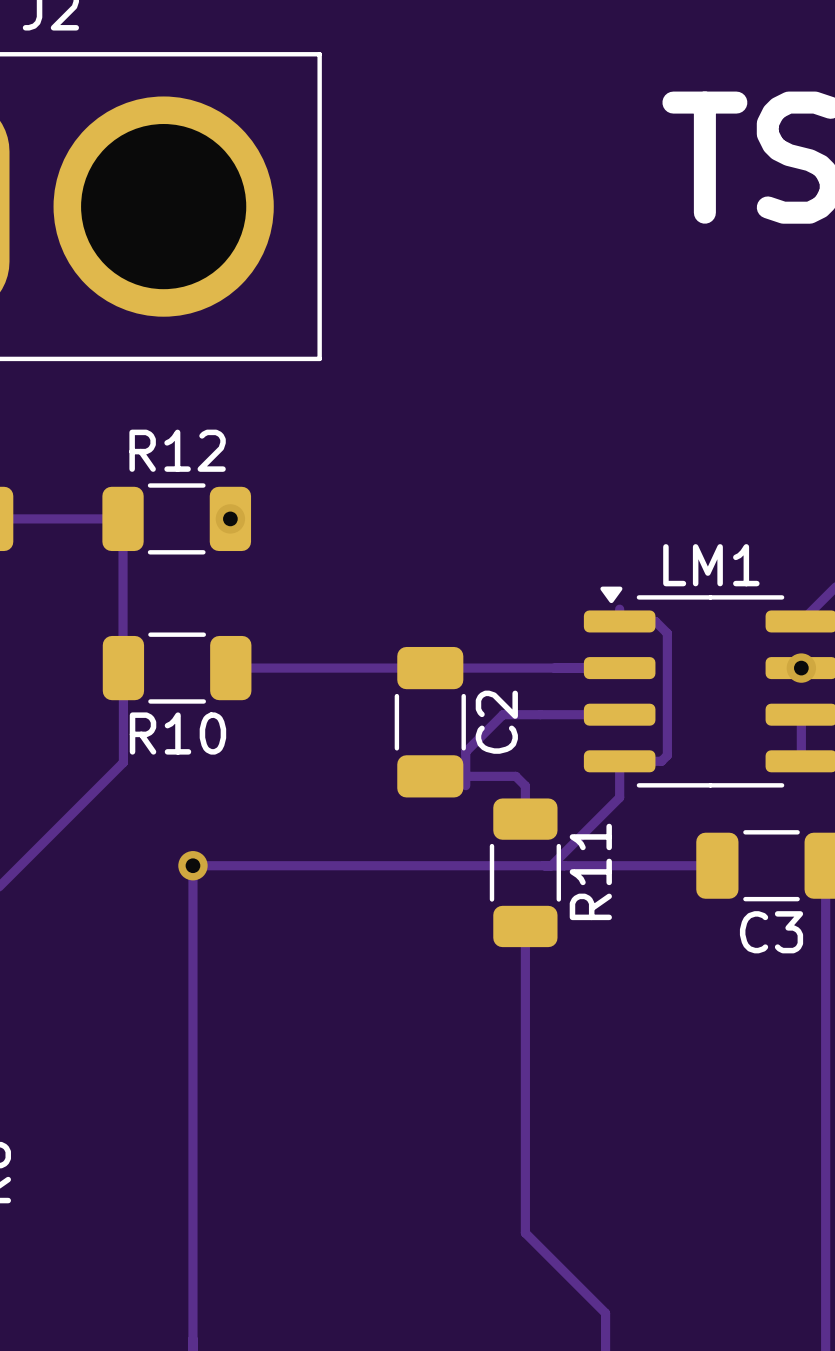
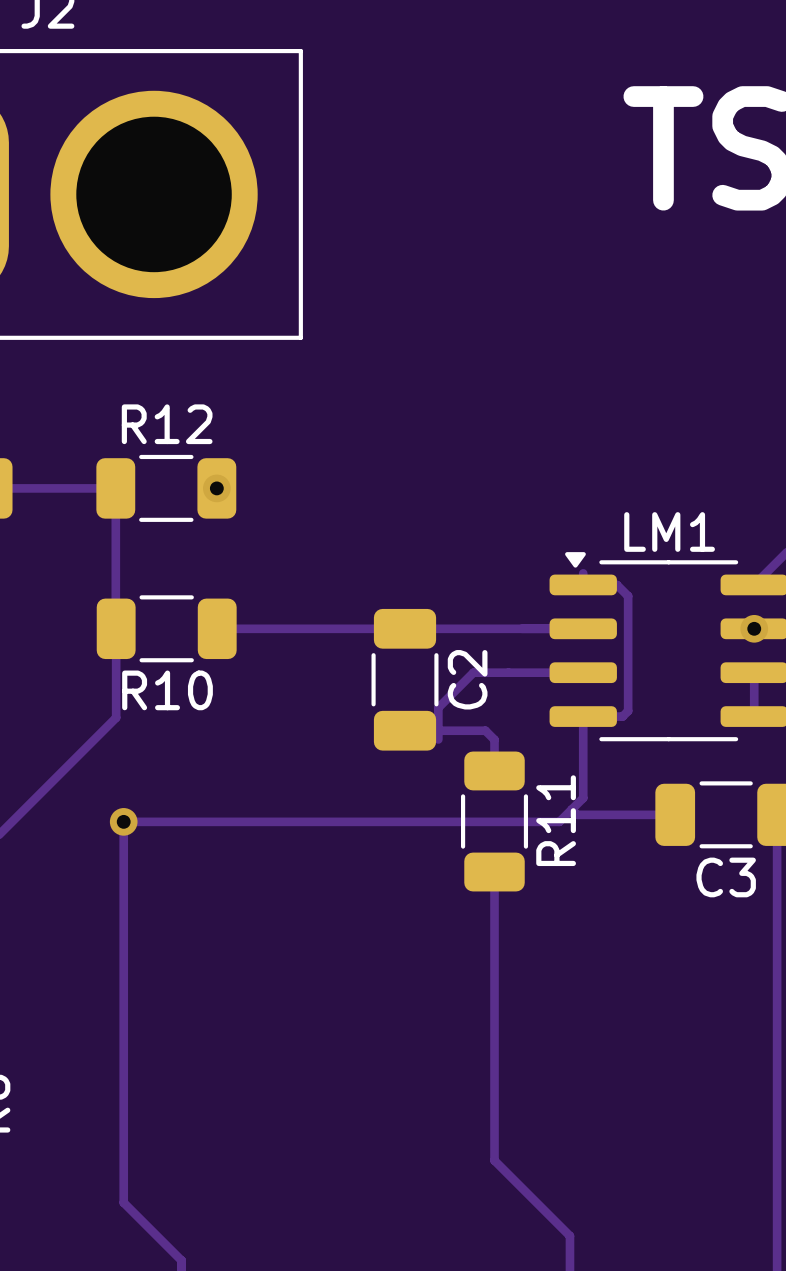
track: (619, 797) (551, 865) -> none
via position: (192, 865) -> (123, 821)
track: (613, 865) (192, 865) (192, 1339) -> (583, 750) (583, 798) (559, 821) (123, 821) (123, 1202) (181, 1260)

